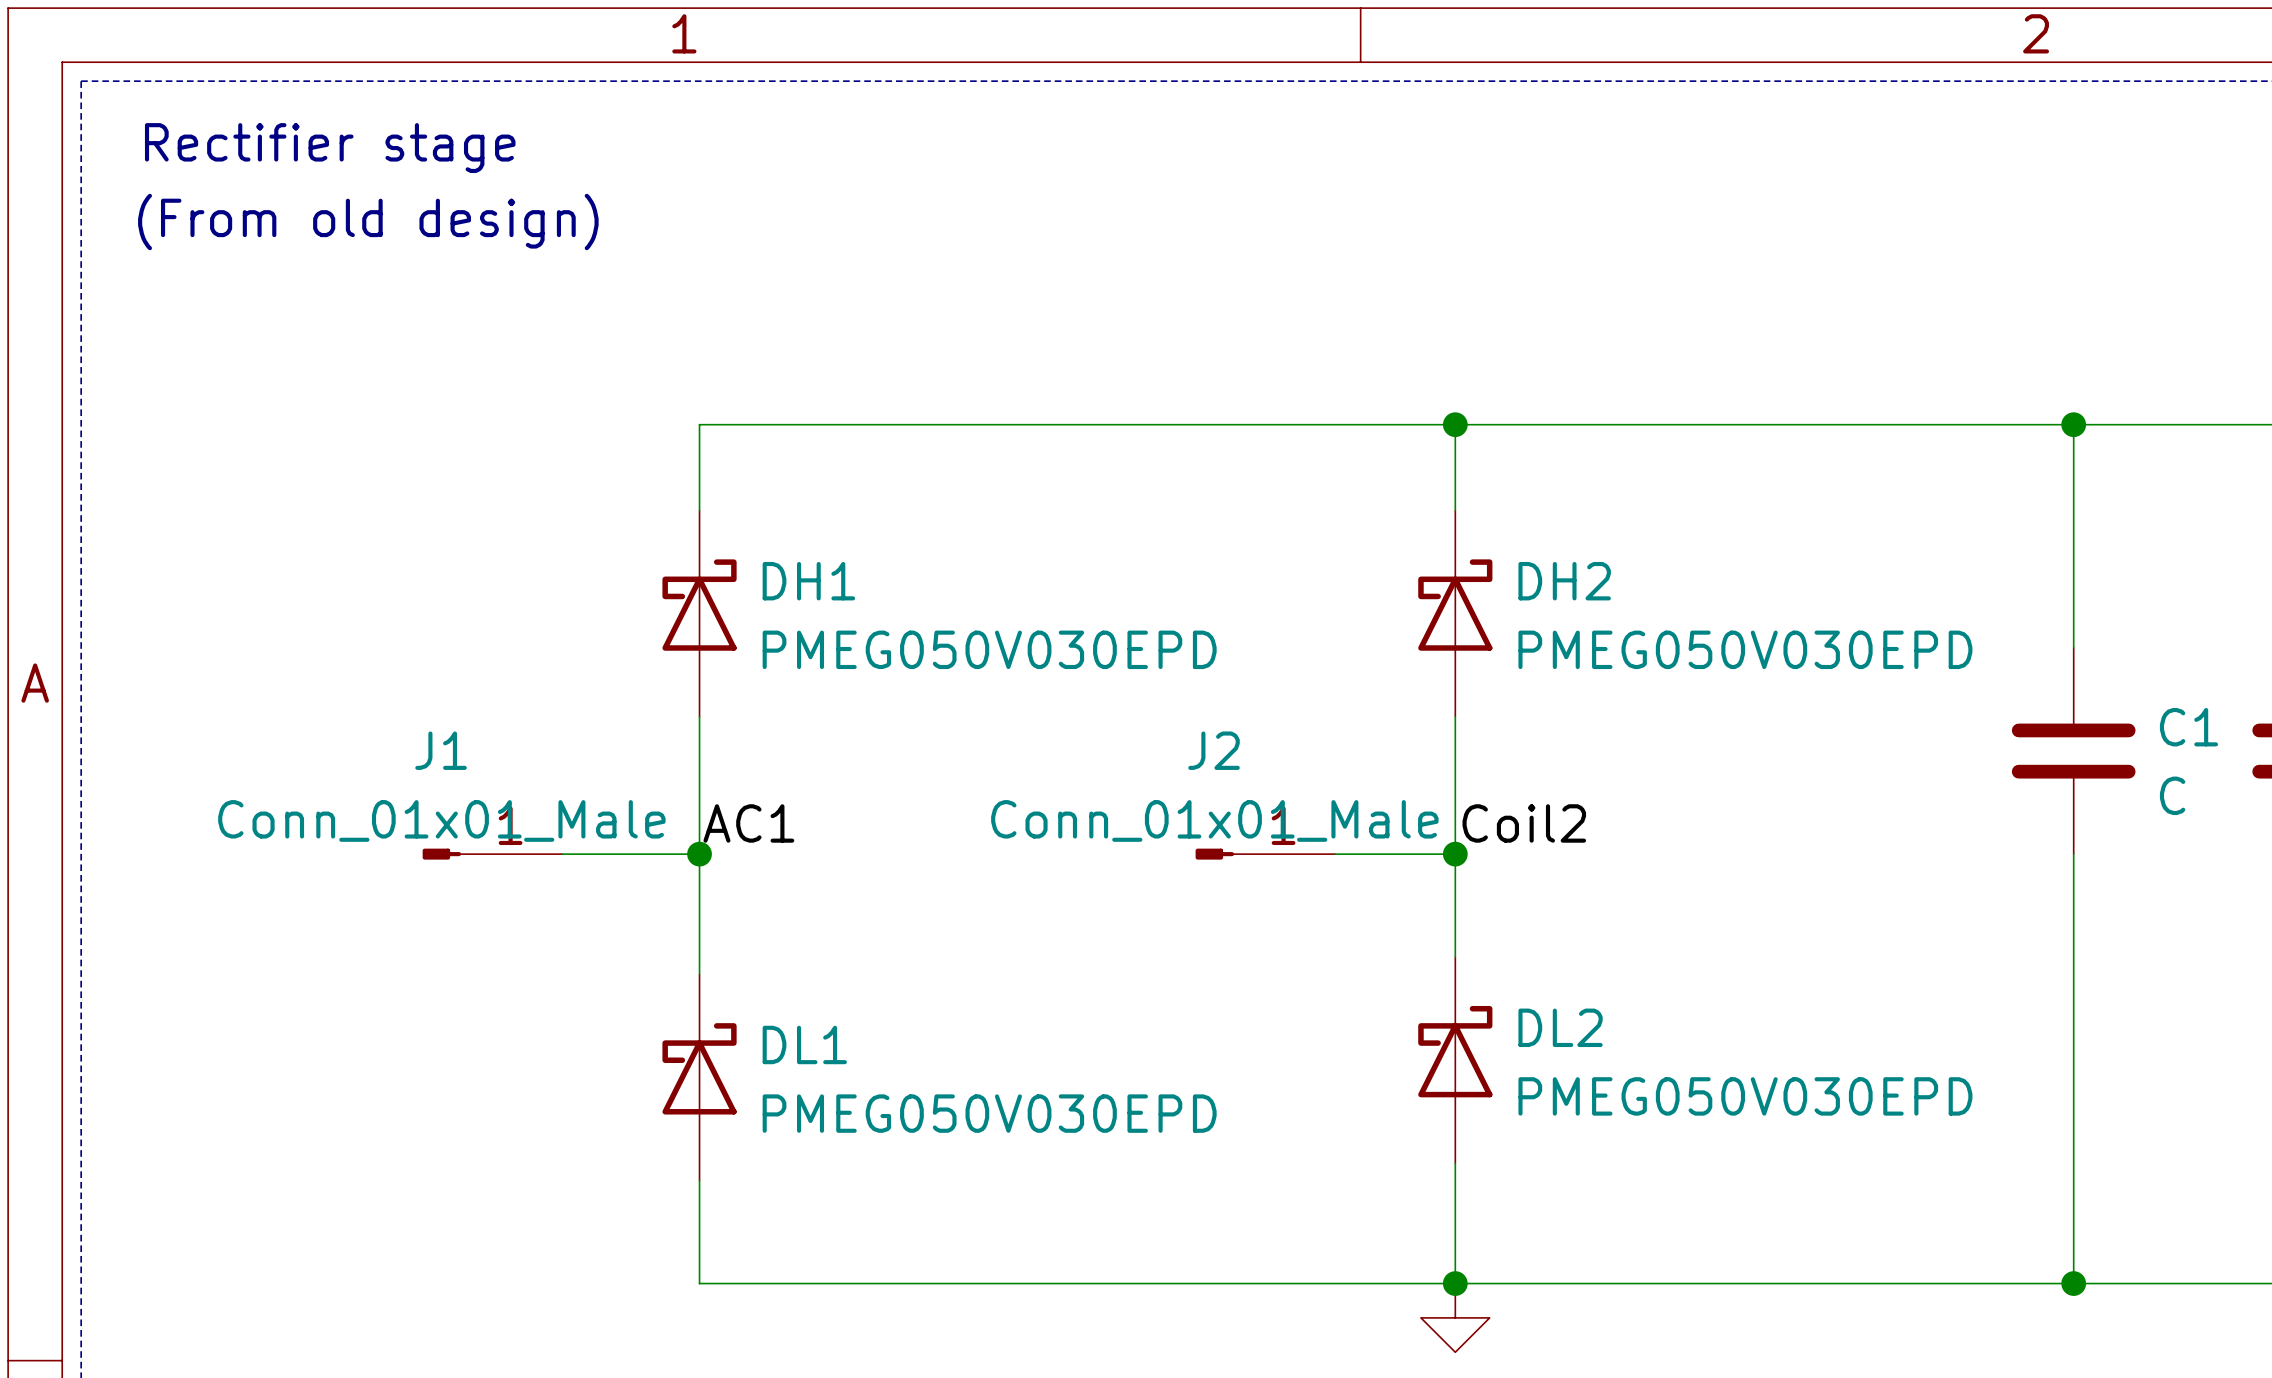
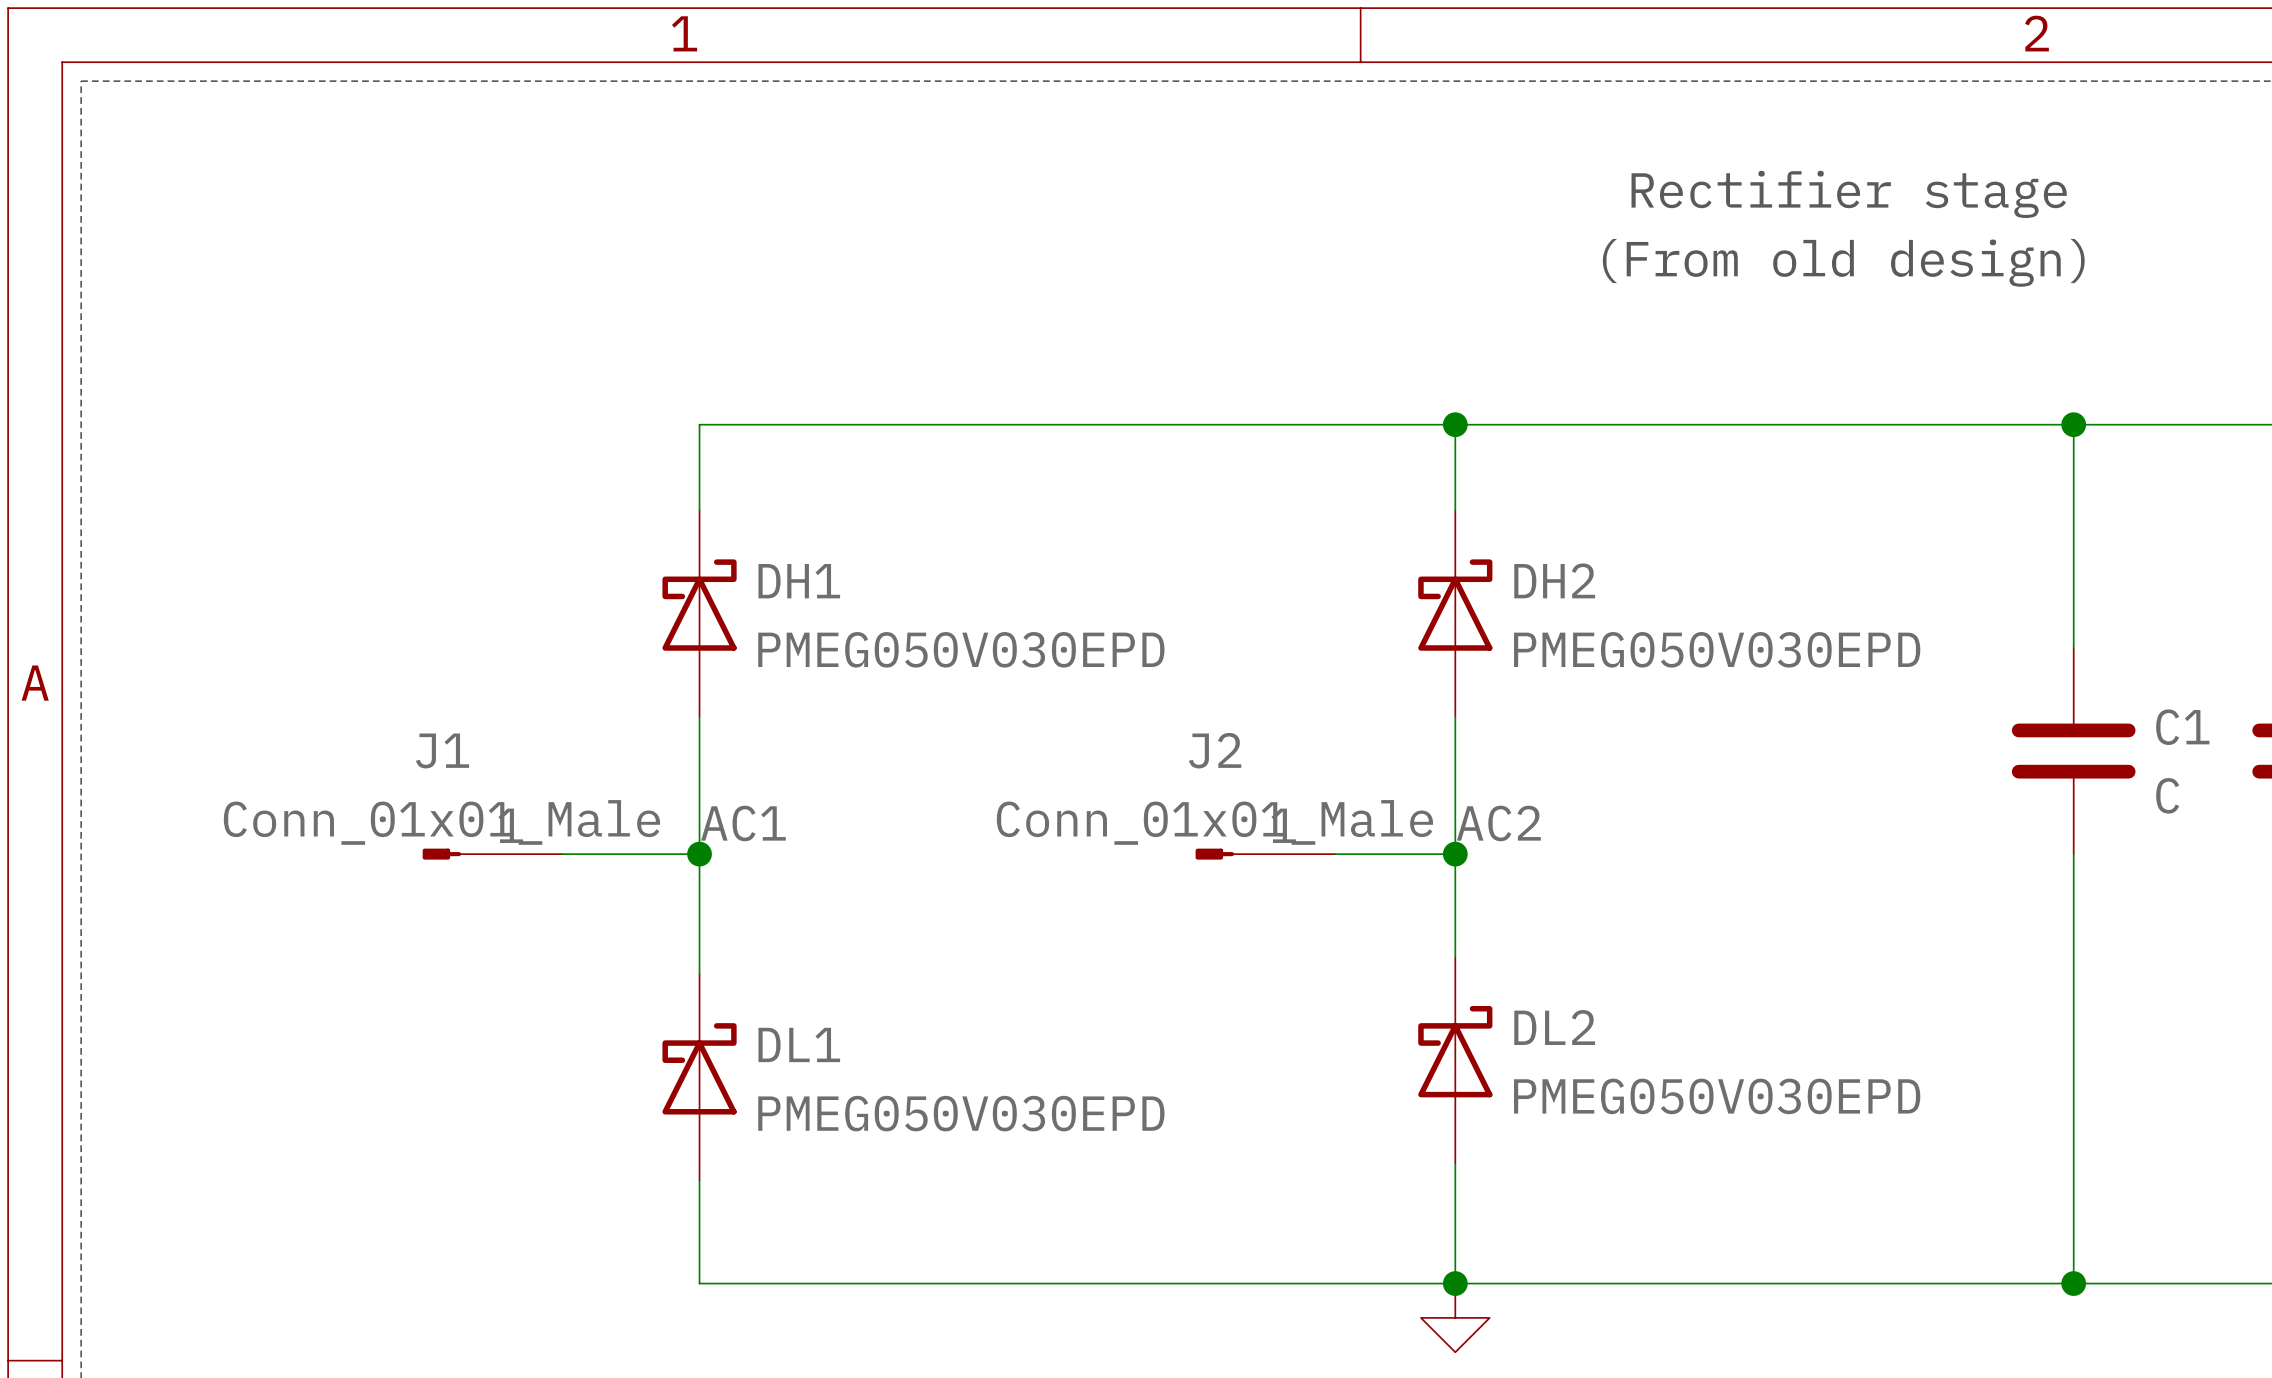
text: Rectifier stage (330, 148) -> none
text: none -> Rectifier stage (1849, 194)
text: (From old design) (368, 222) -> none
text: none -> (From old design) (1843, 262)
label: Coil2 (1524, 823) -> AC2 (1498, 823)

